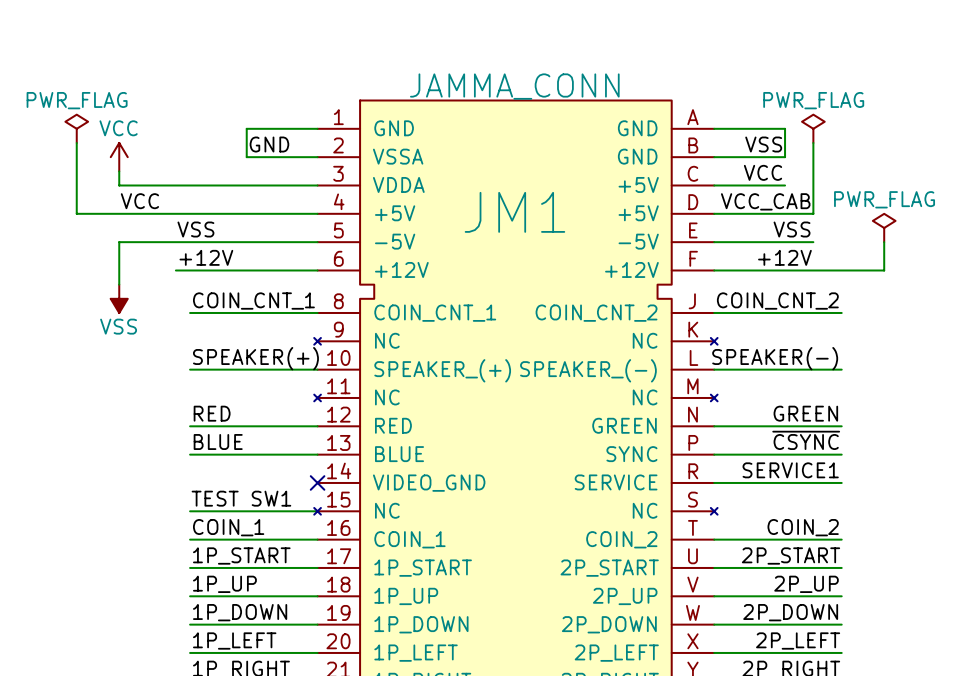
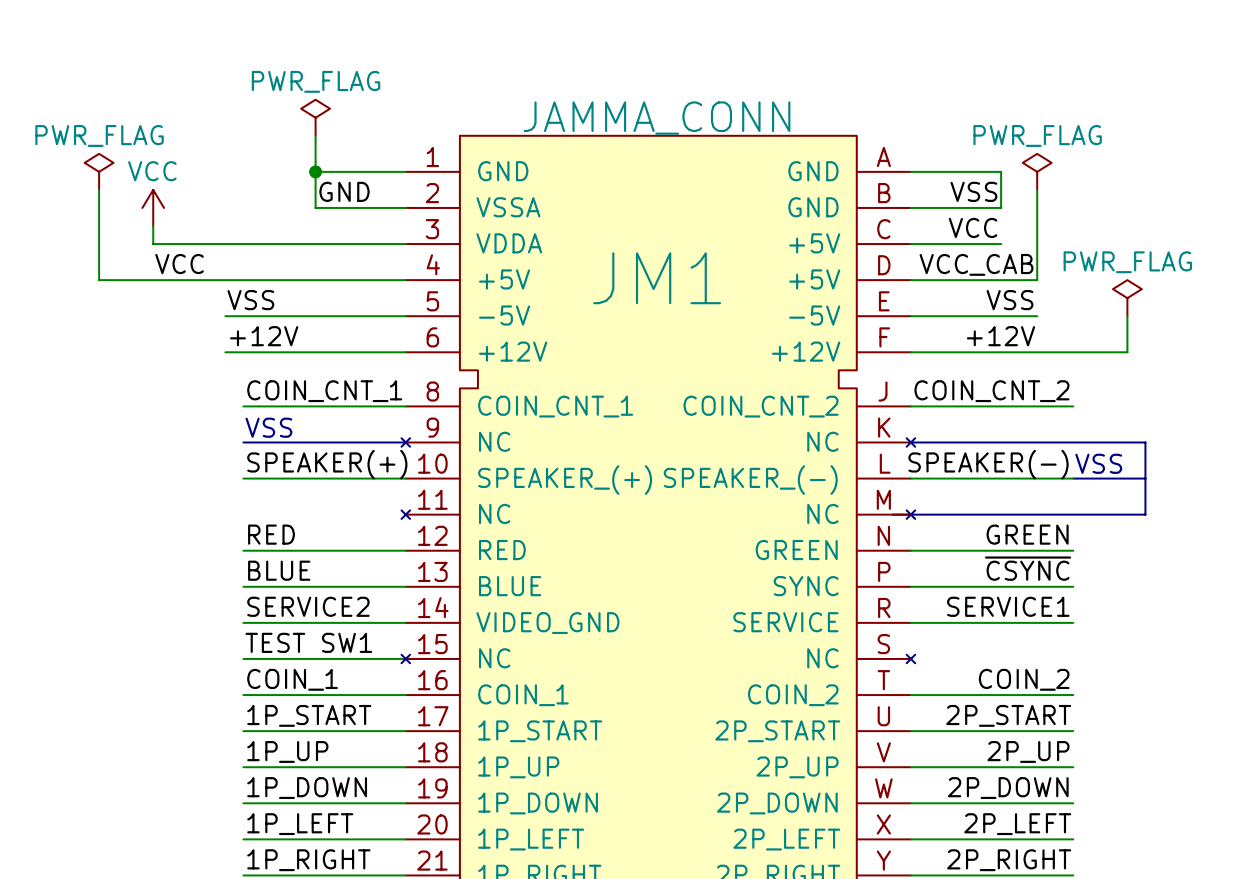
power symbol: none -> PWR_FLAG (315, 117)
wire: none -> (315, 135) (315, 171)
junction: none -> (315, 171)
wire: (175, 242) (119, 242) (119, 284) -> none
power symbol: VSS (119, 298) -> none
text: none -> VSS (268, 427)
line: none -> (243, 442) (405, 442)
line: none -> (910, 442) (1145, 442) (1145, 514) (892, 514)
text: none -> VSS (1098, 463)
line: none -> (1073, 478) (1145, 478)
label: none -> SERVICE2 (308, 606)
wire: none -> (243, 622) (405, 622)
no-connect mark: (317, 482) -> none

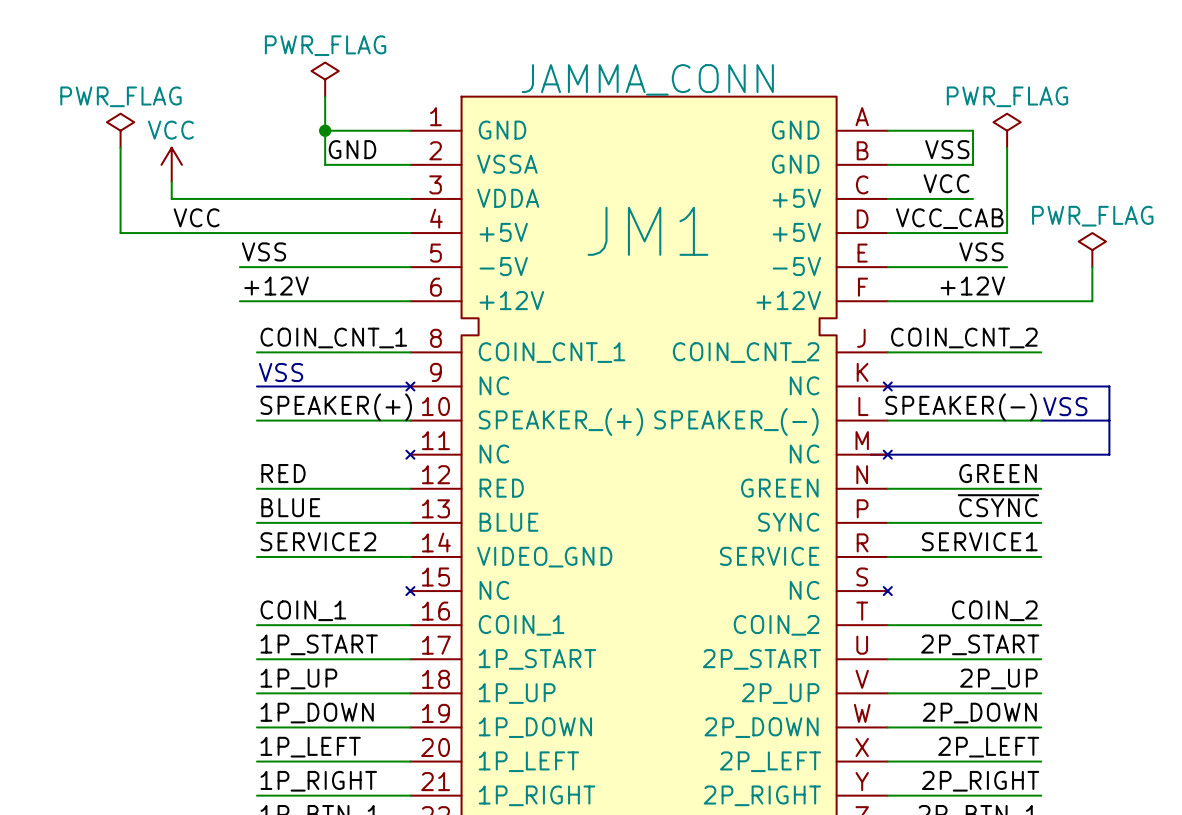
label: TEST SW1 (308, 642) -> none
wire: (243, 658) (405, 658) -> none

